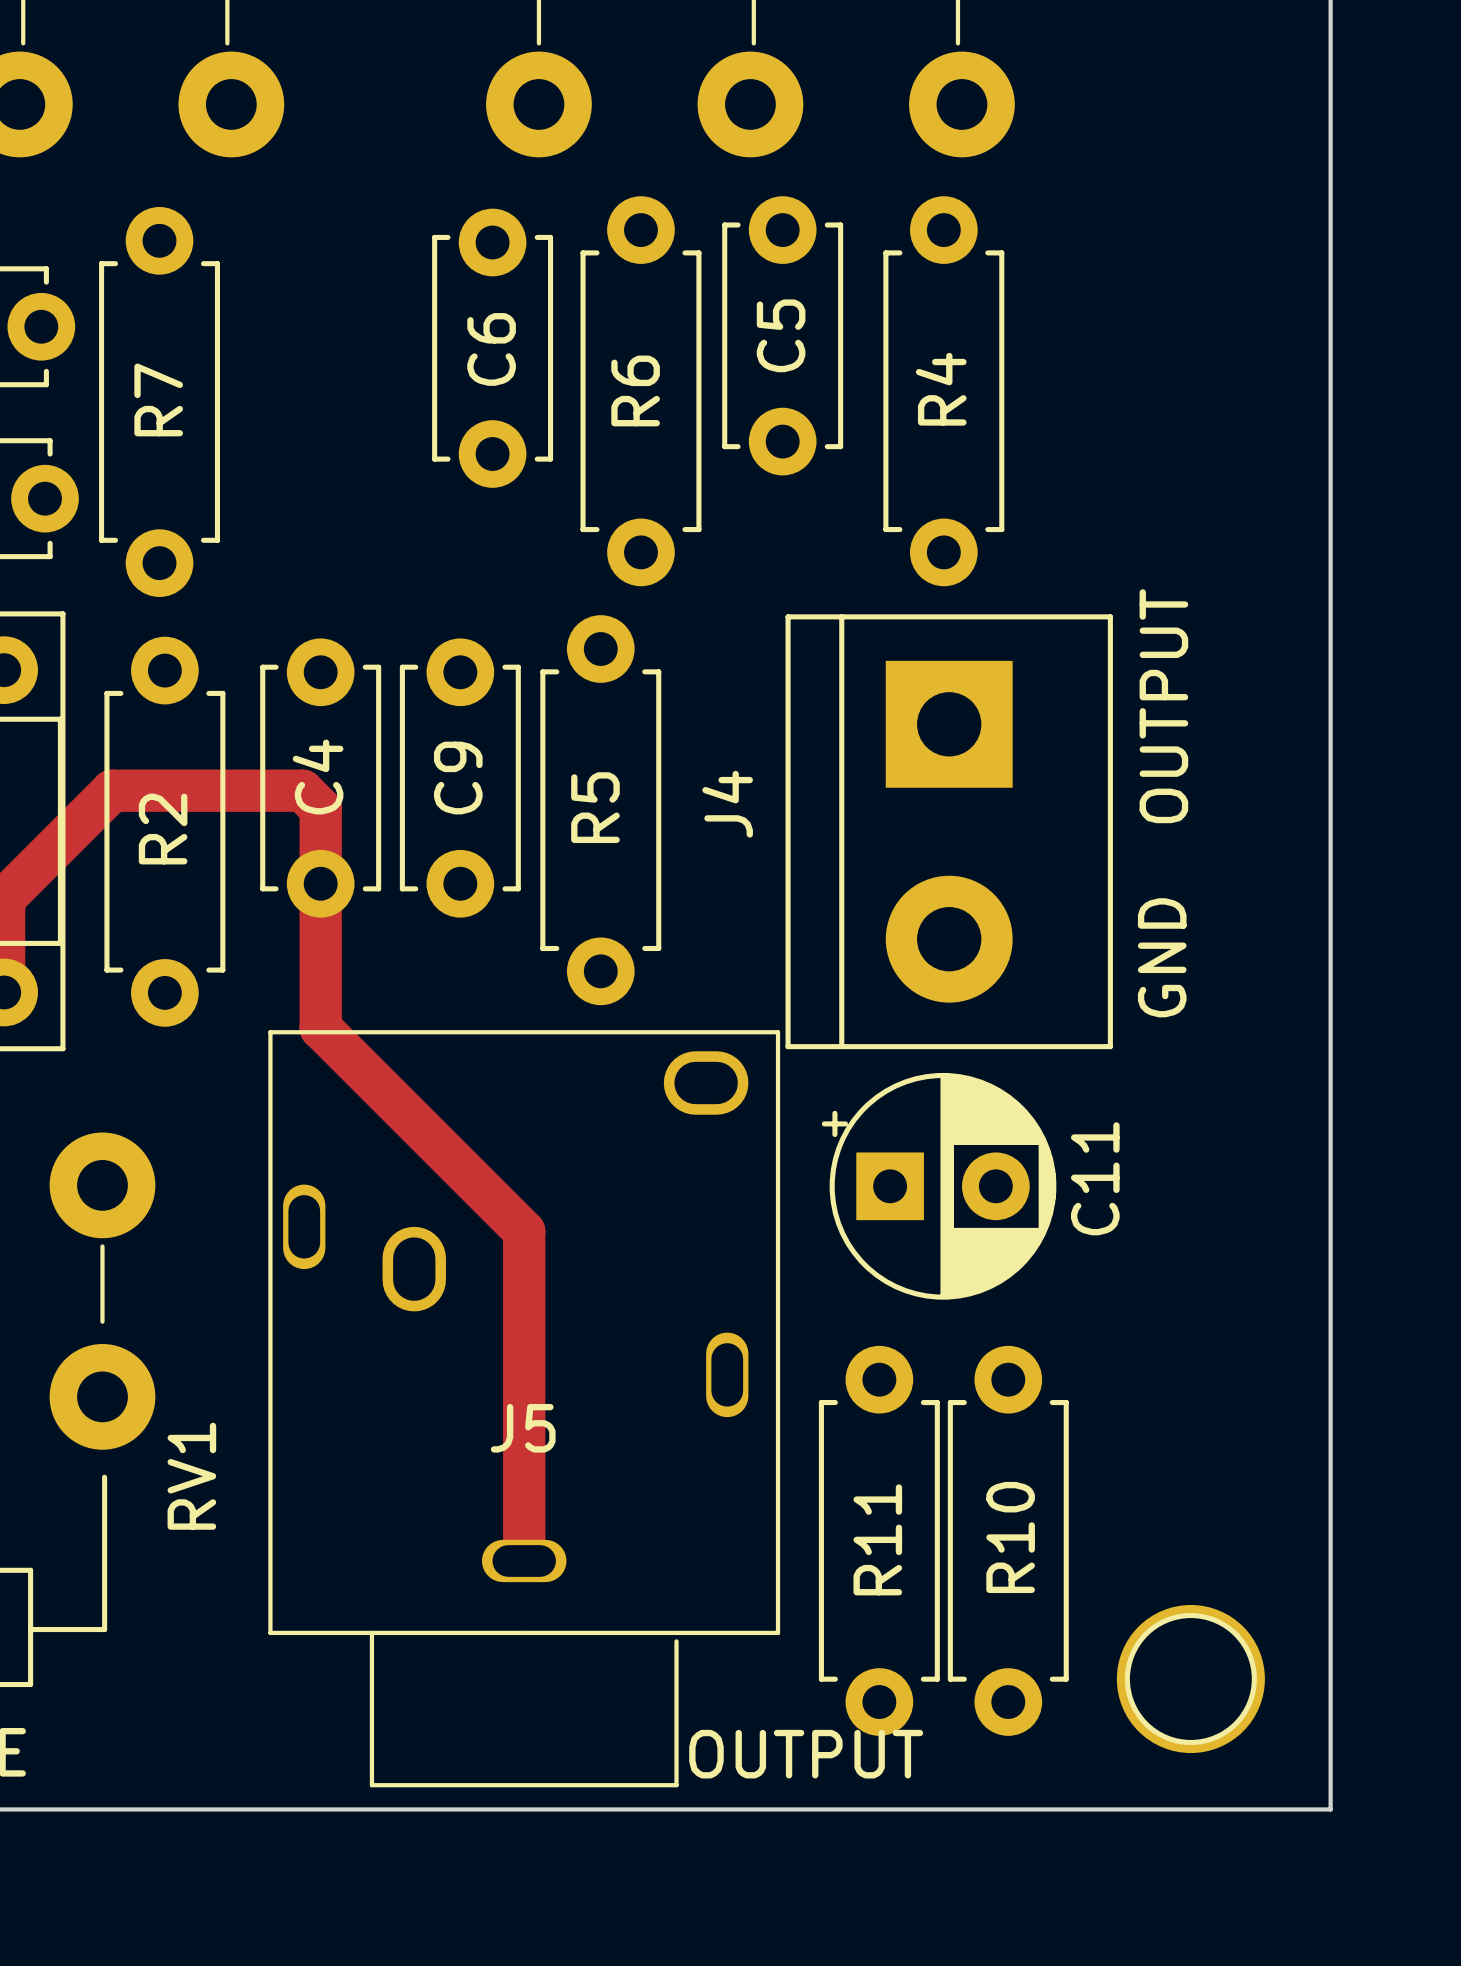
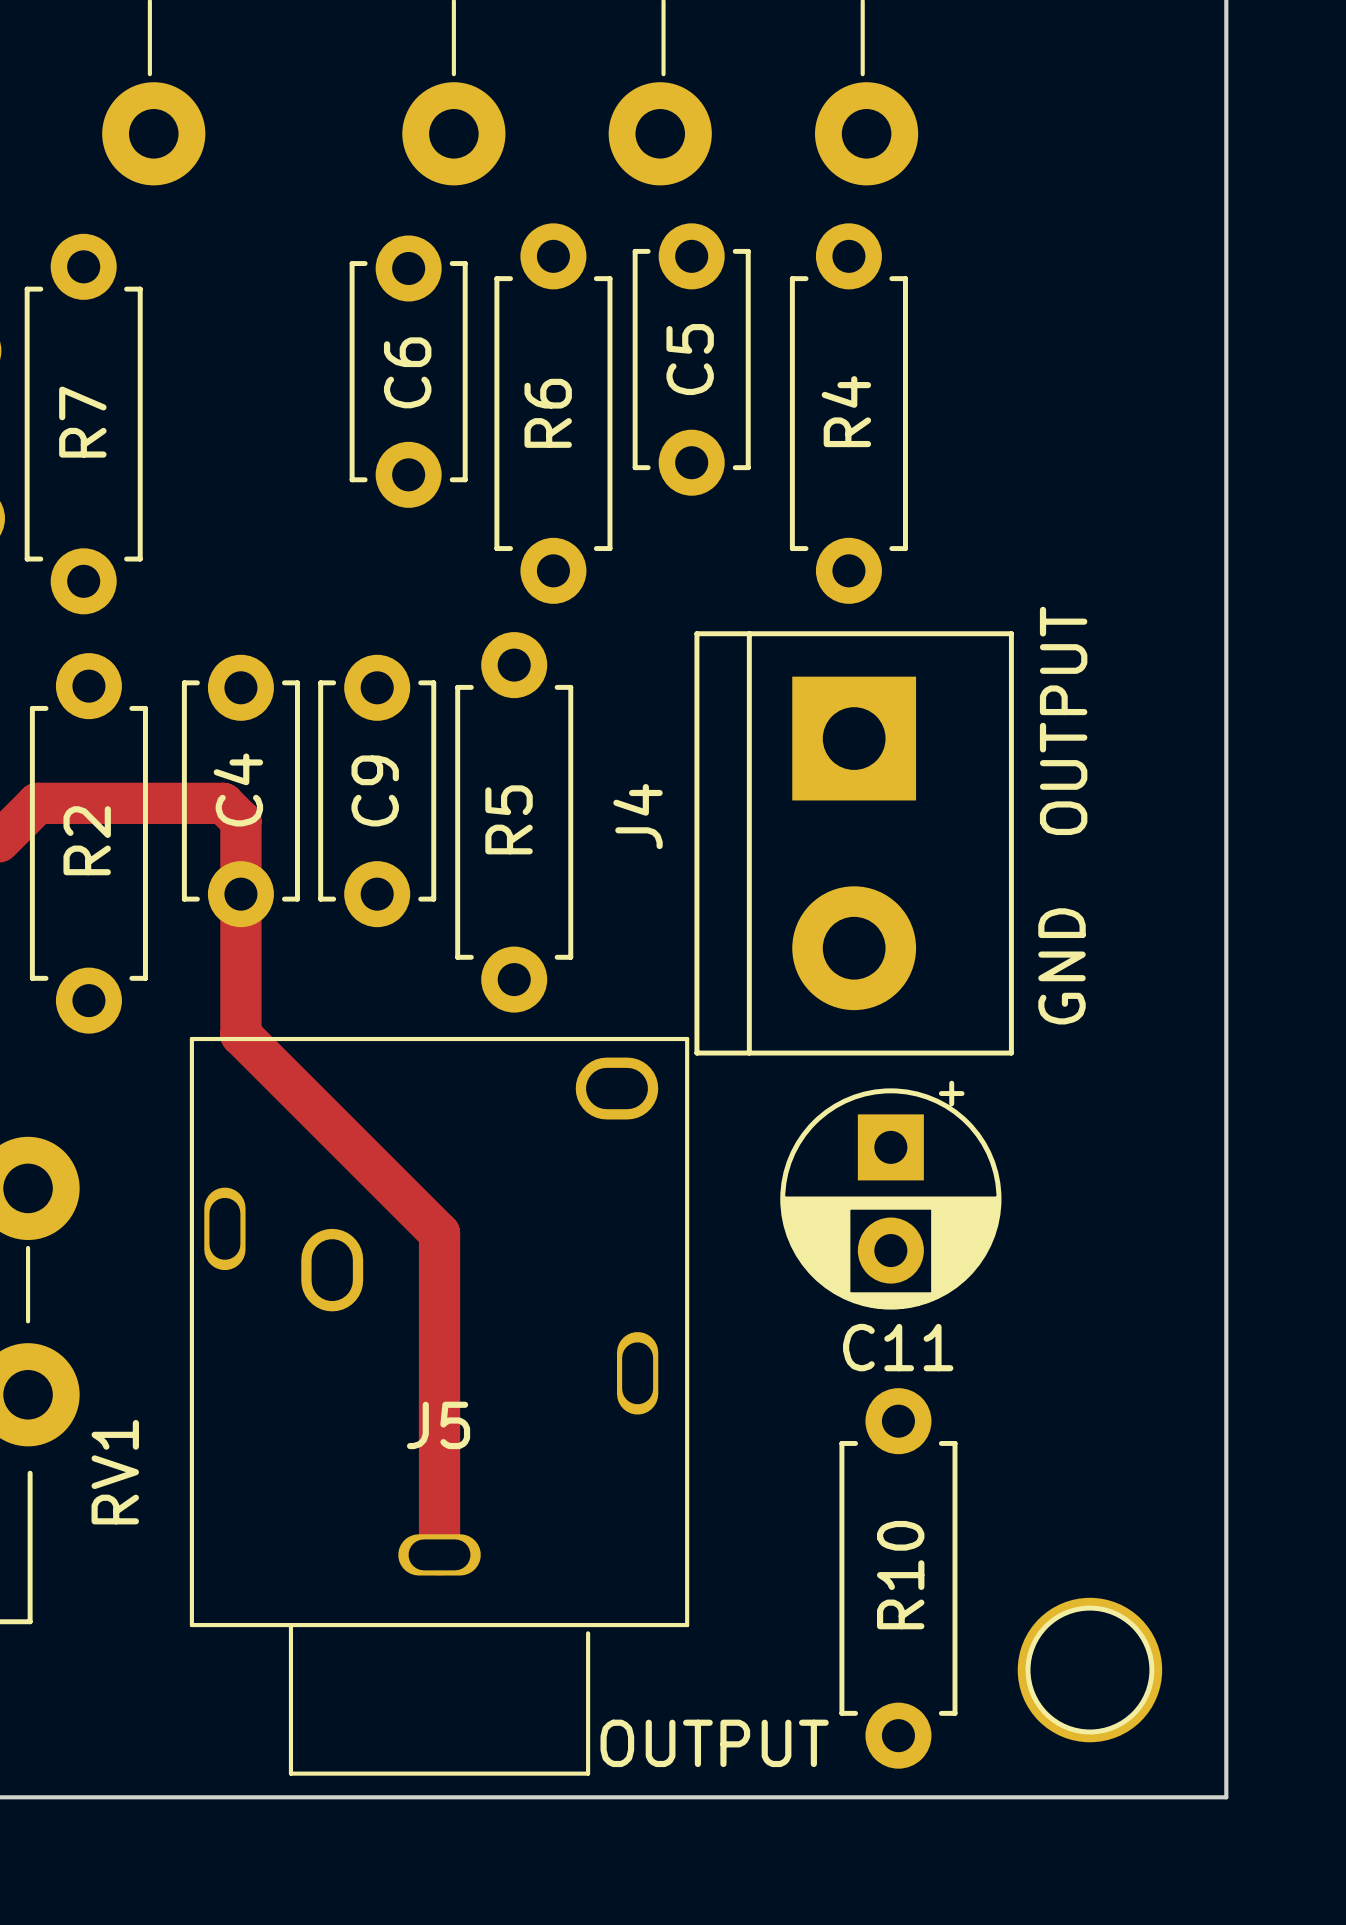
C11 rotation: 0° (939, 1186) -> 90° clockwise (890, 1195)
R11: (879, 1540) -> none
R10 position: (1008, 1540) -> (898, 1578)

